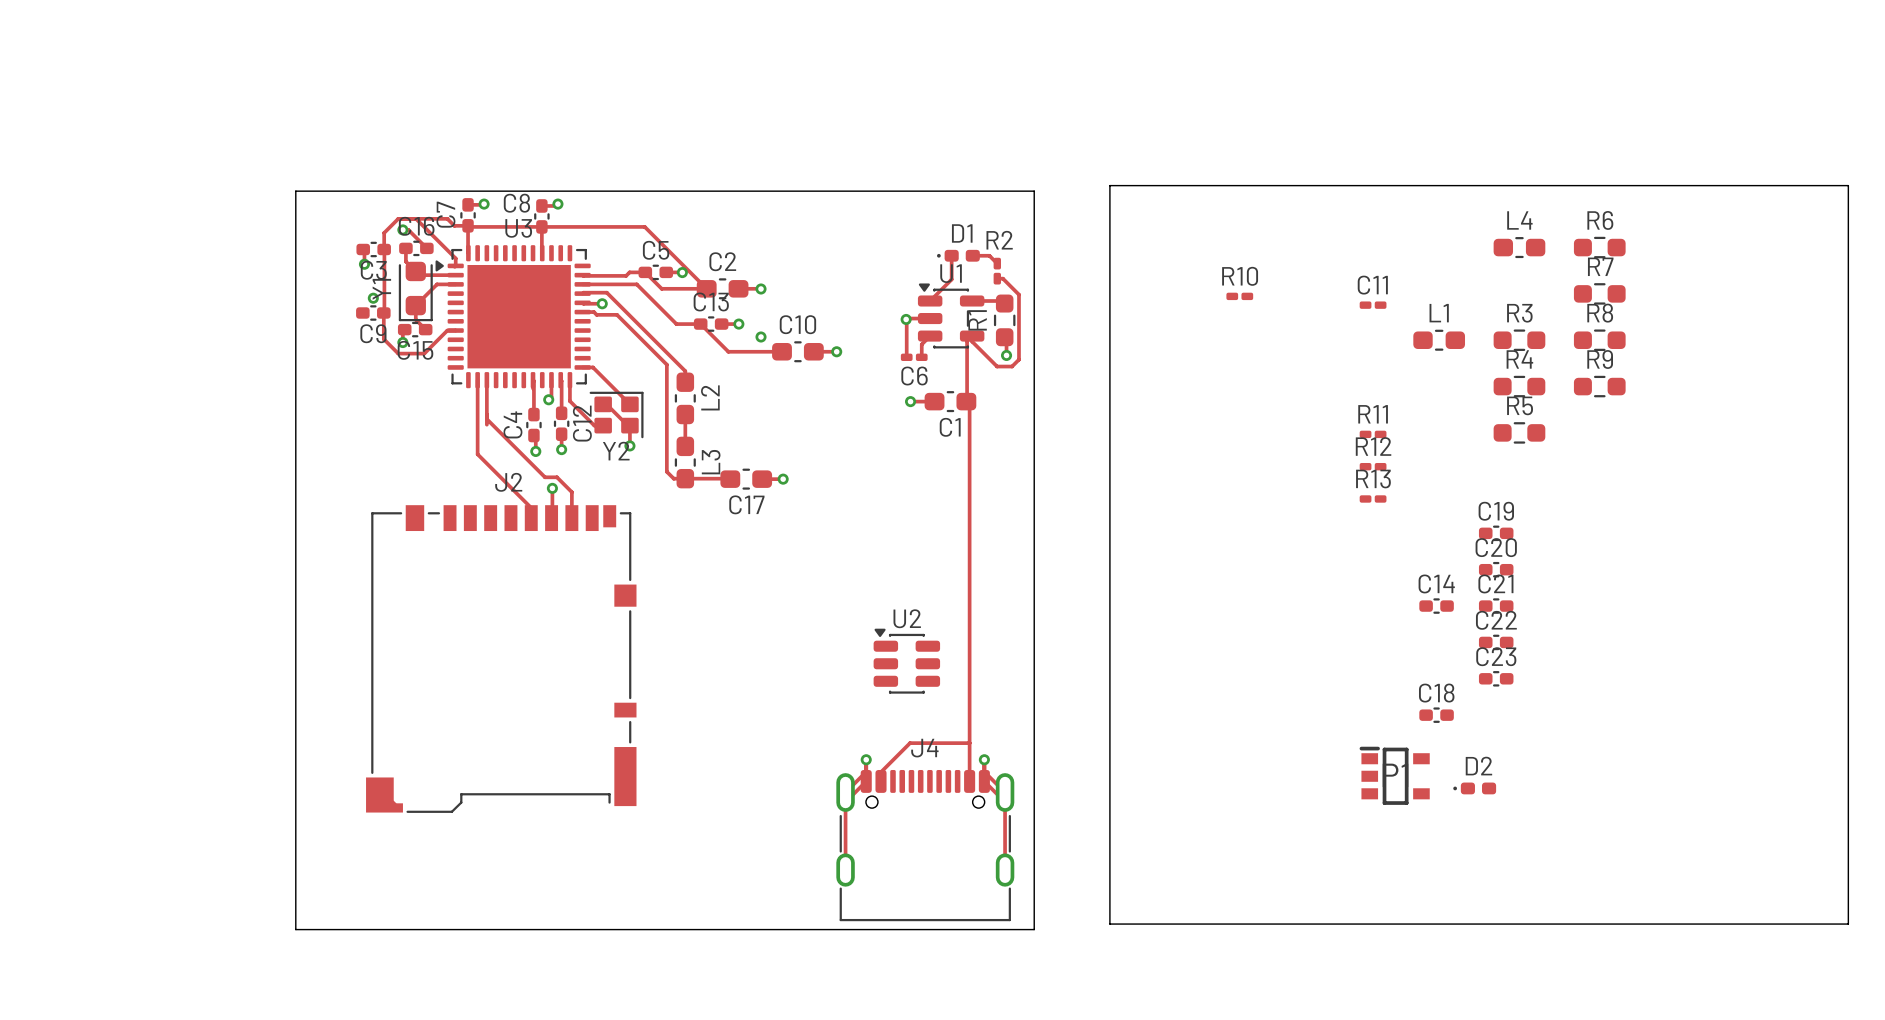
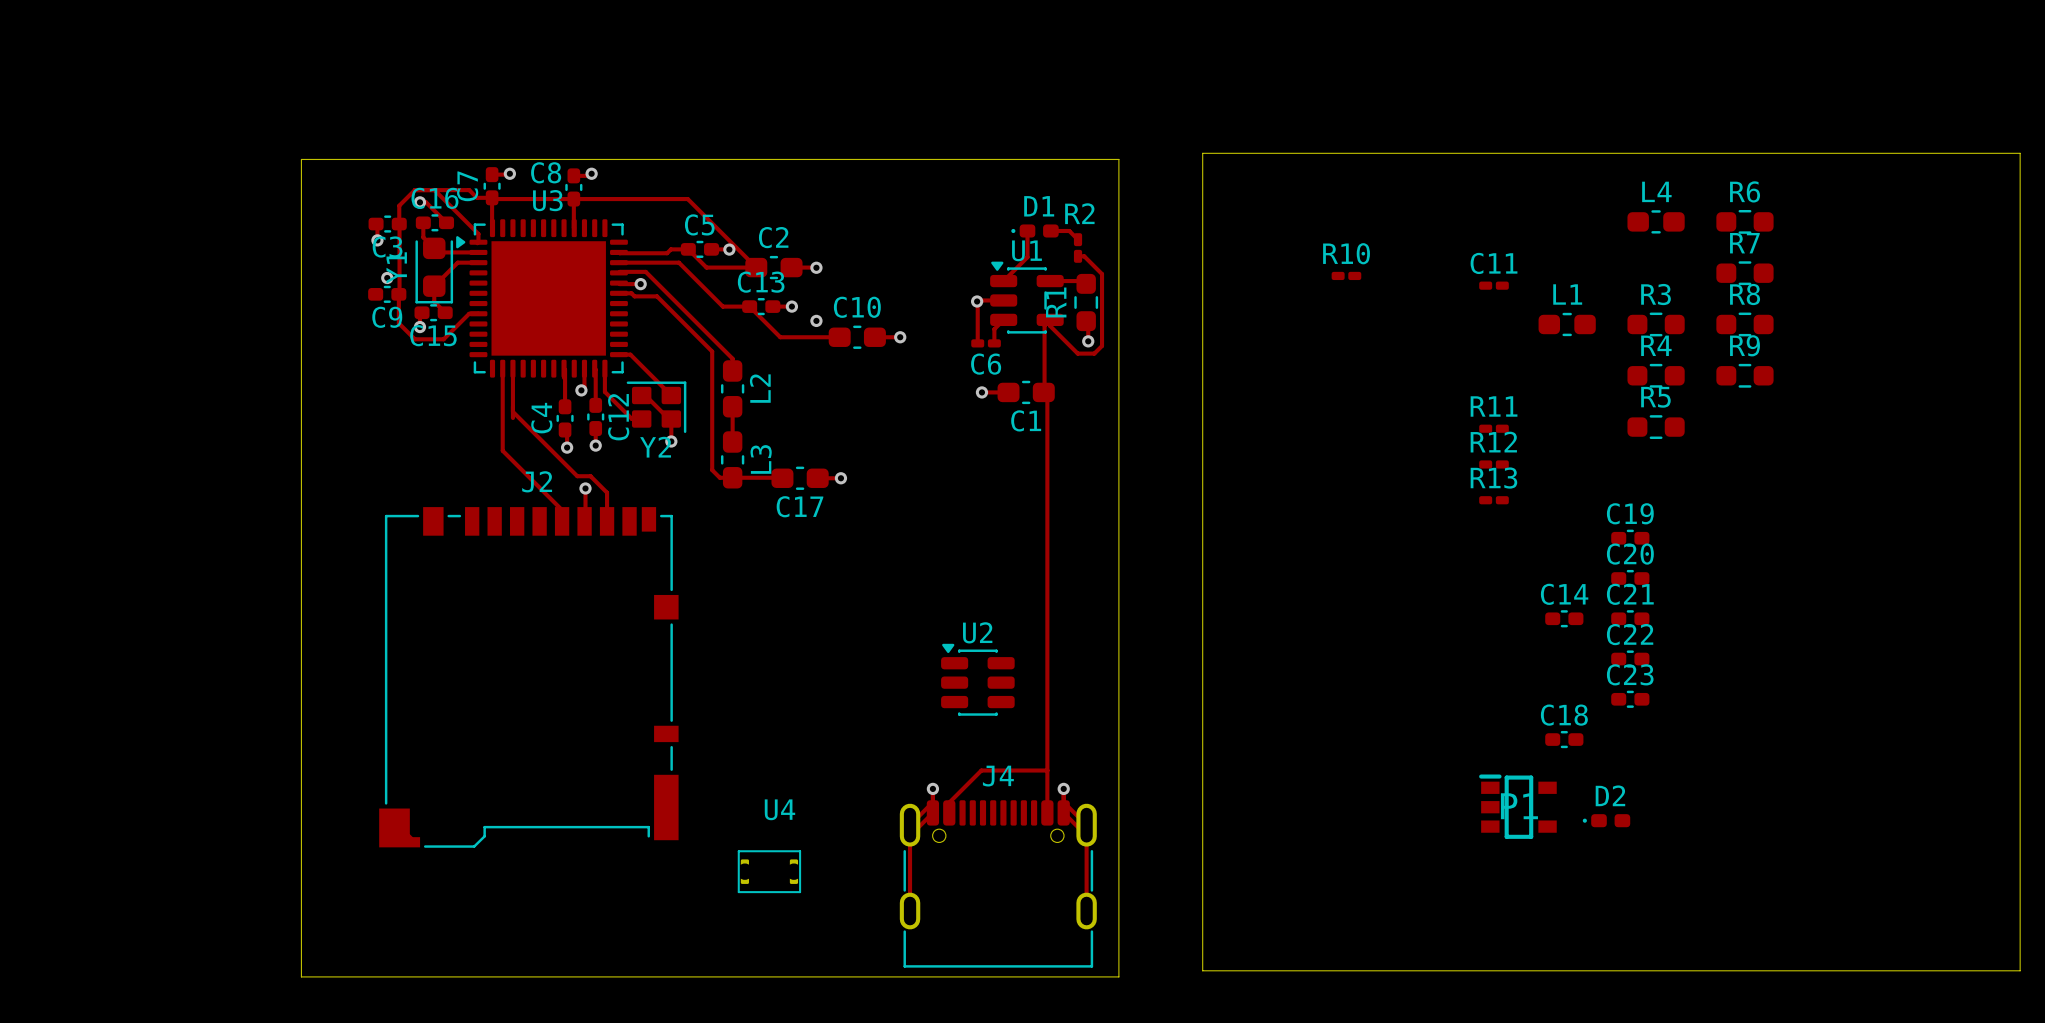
U4: none -> (769, 871)

